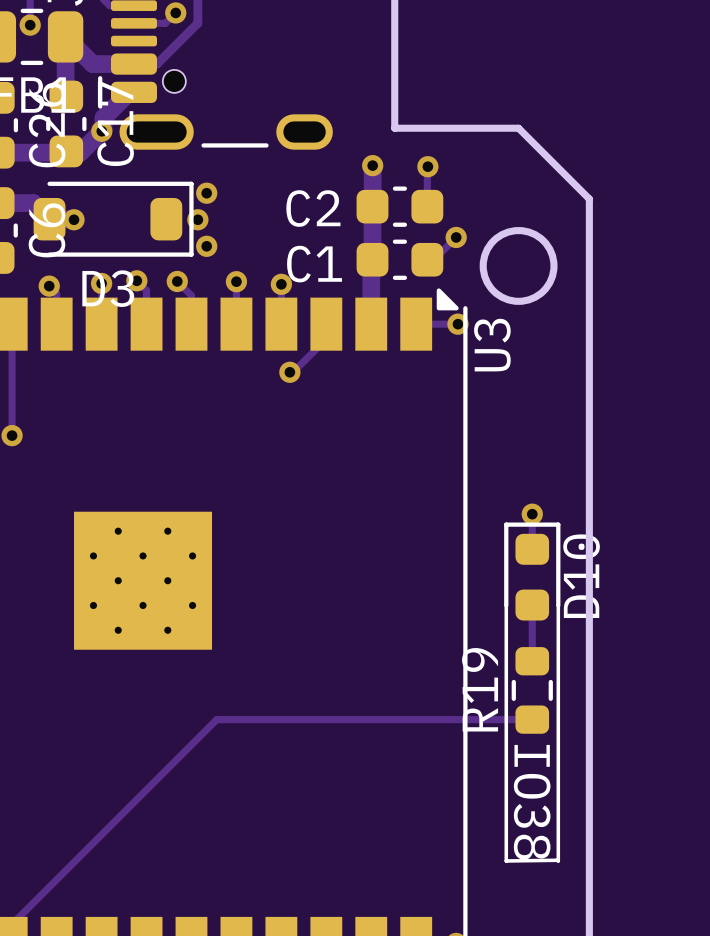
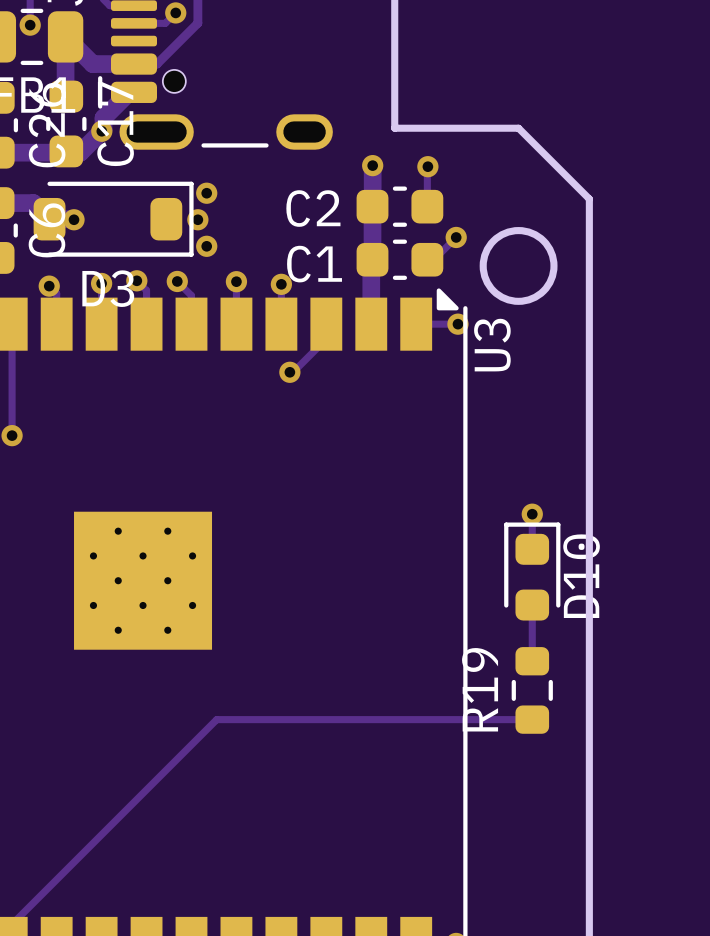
line: (506, 605) (506, 860) (557, 860) -> none
line: (558, 605) (558, 861) -> none
text: IO38 (532, 802) -> none

